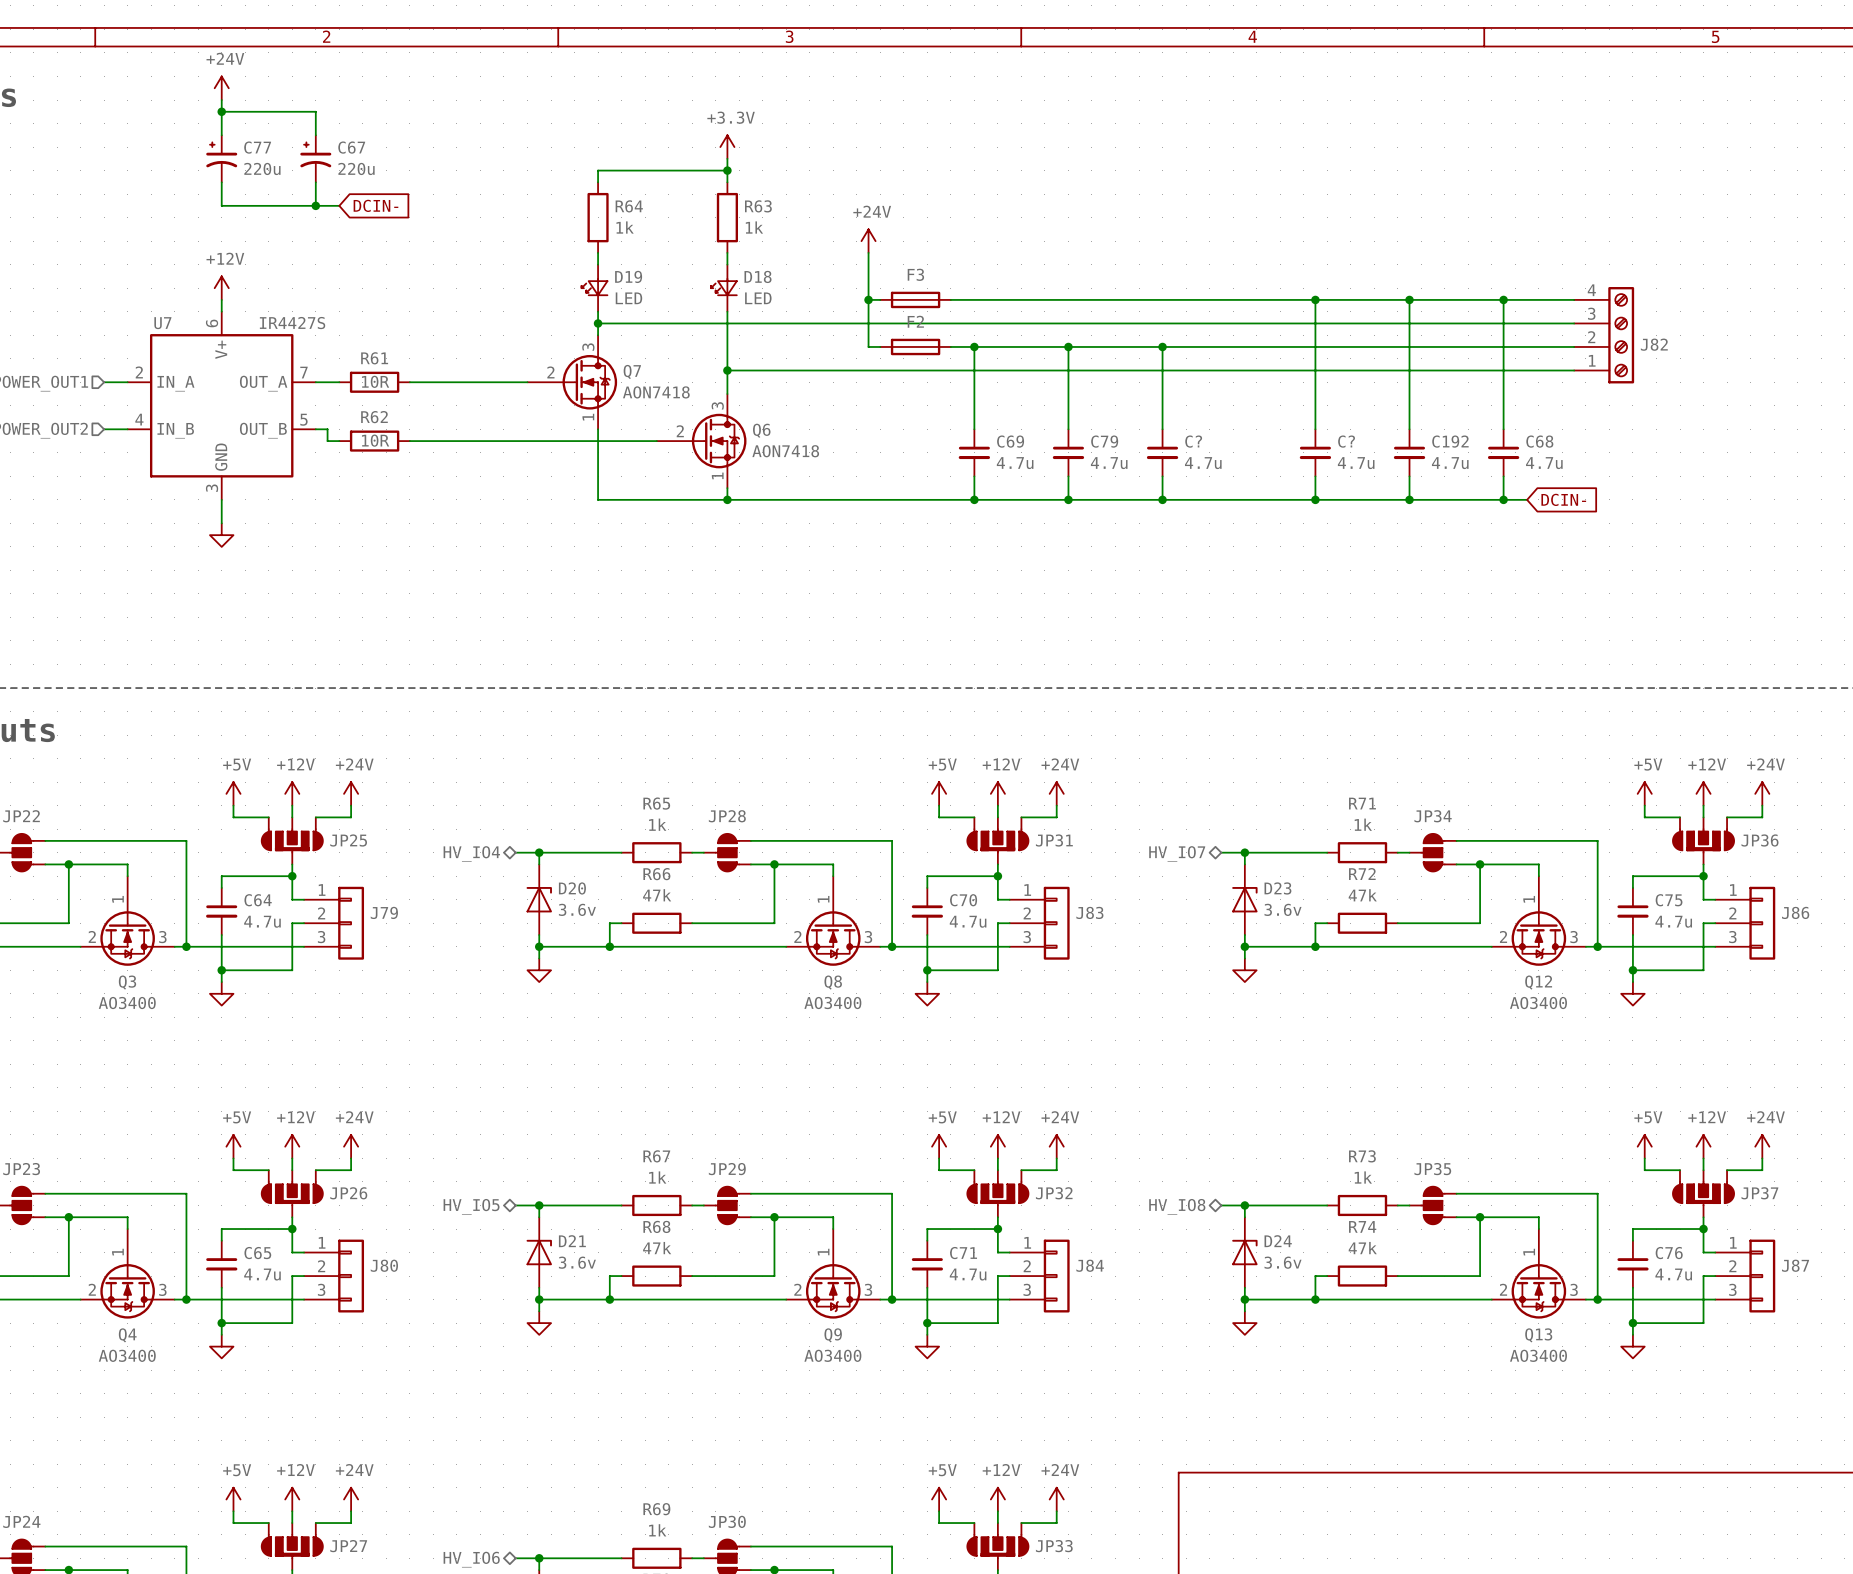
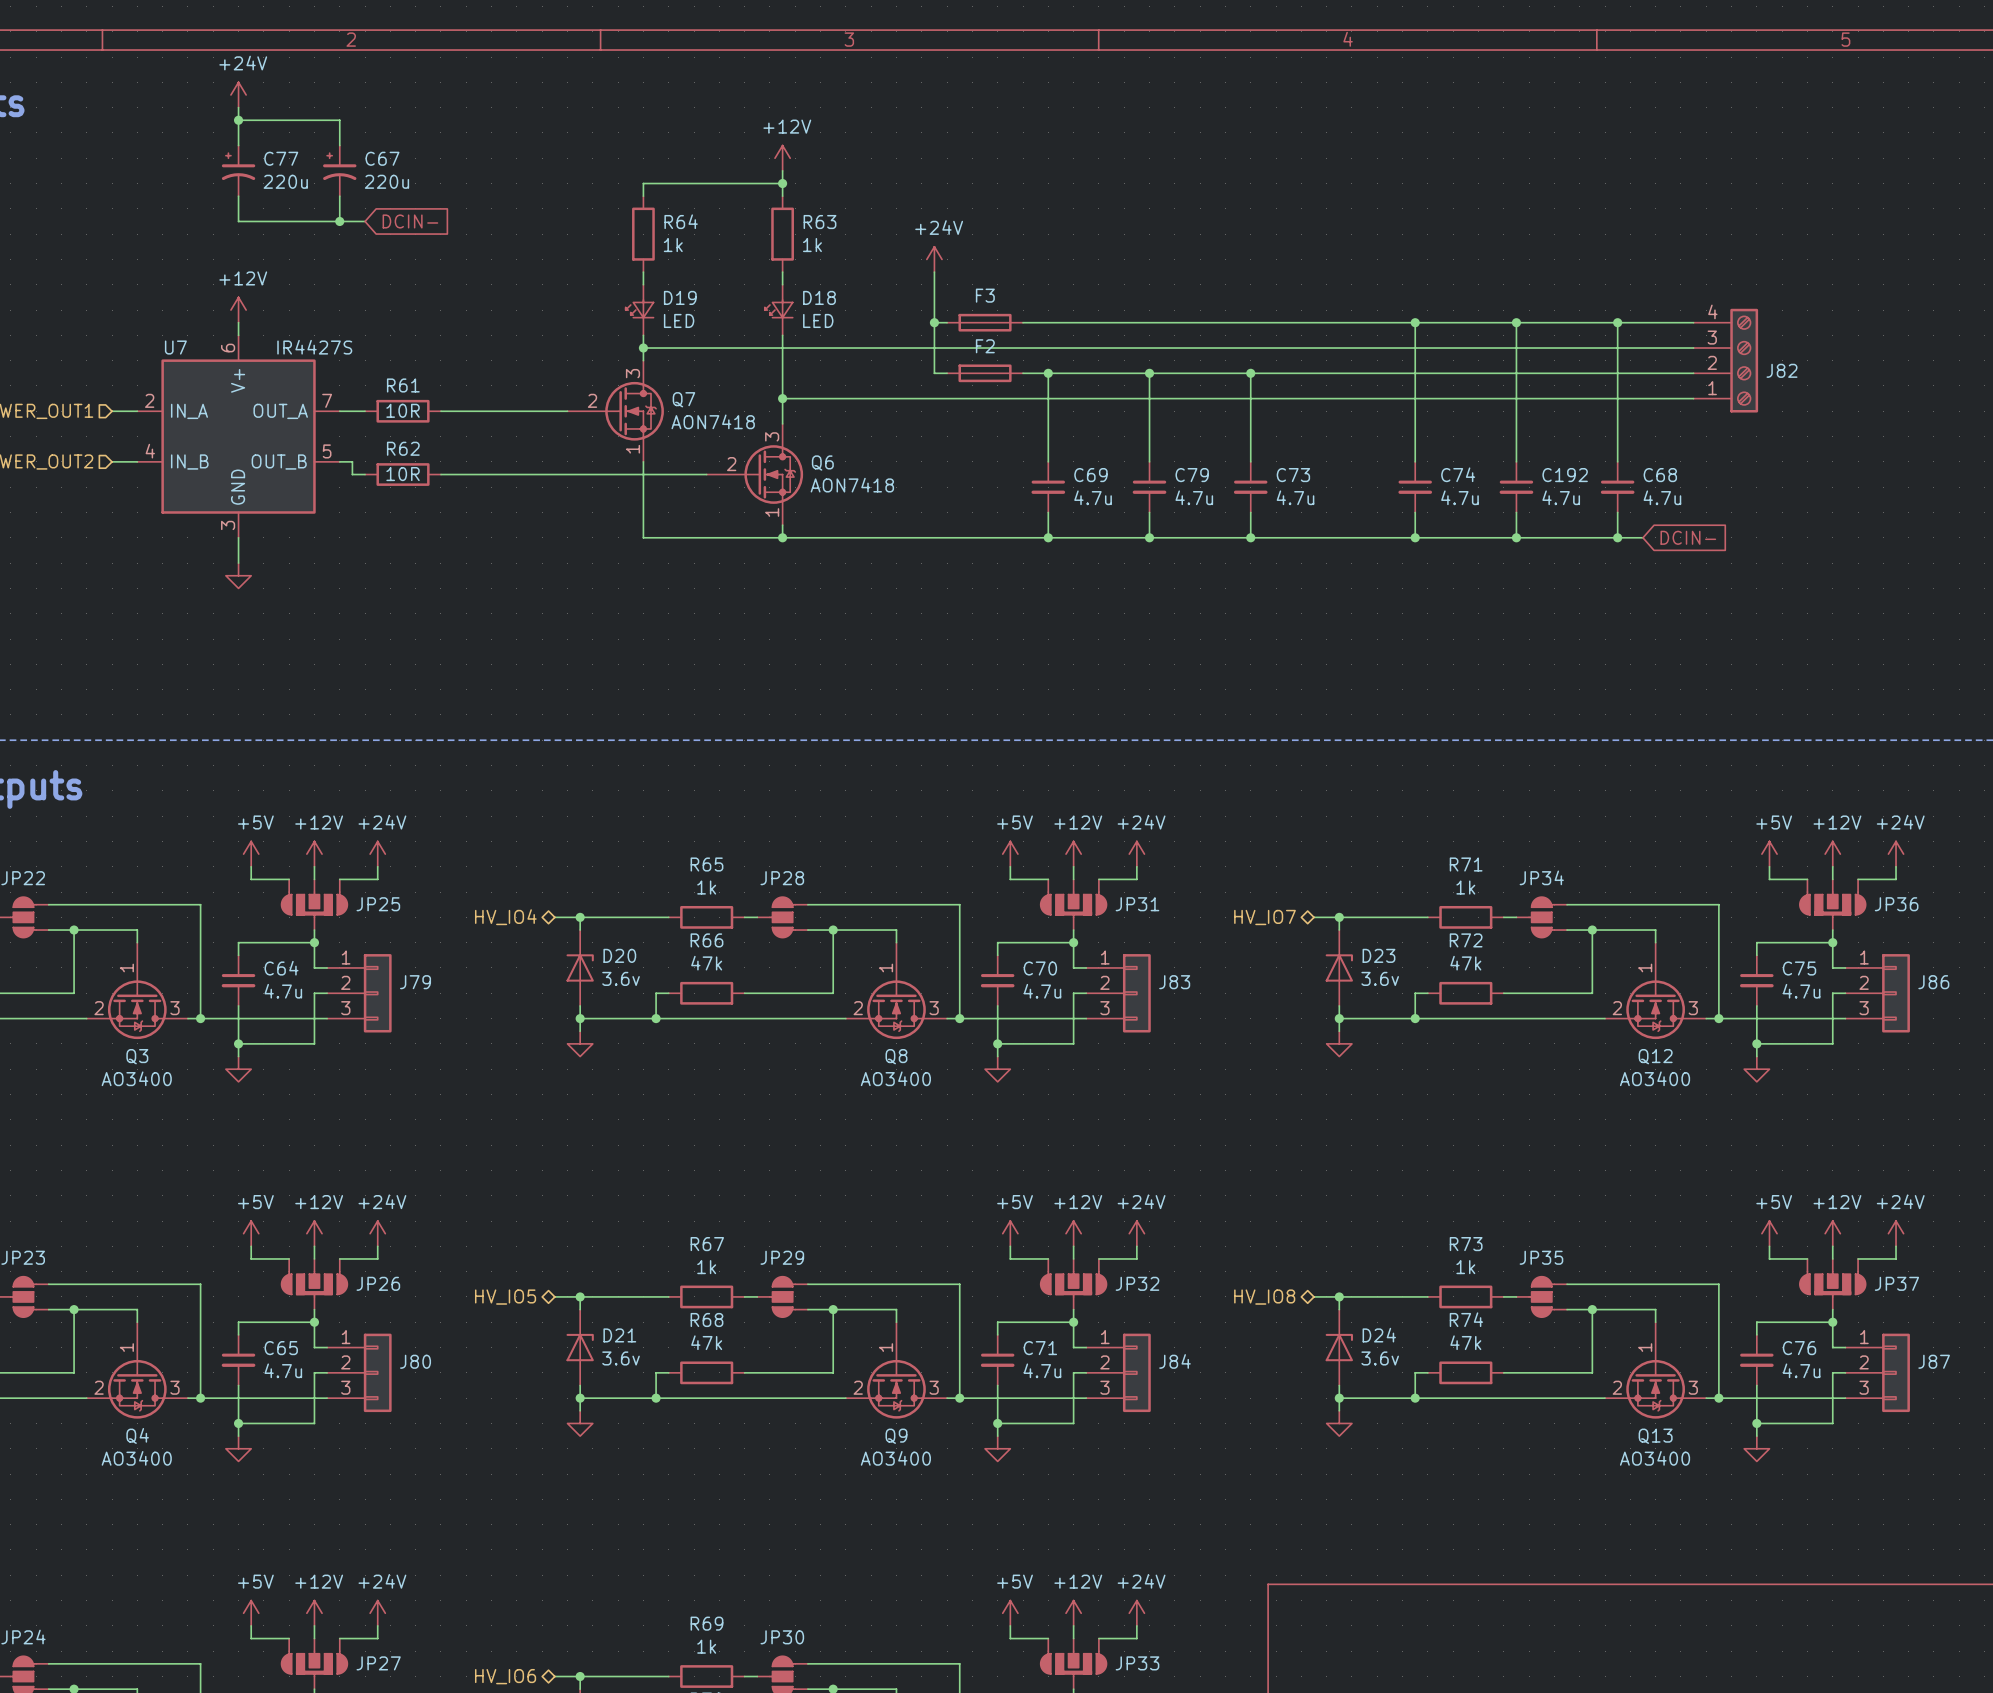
power symbol: +3.3V (727, 147) -> +12V (782, 158)
C? name: C? (1193, 441) -> C73 (1293, 475)
C? name: C? (1346, 441) -> C74 (1458, 474)

